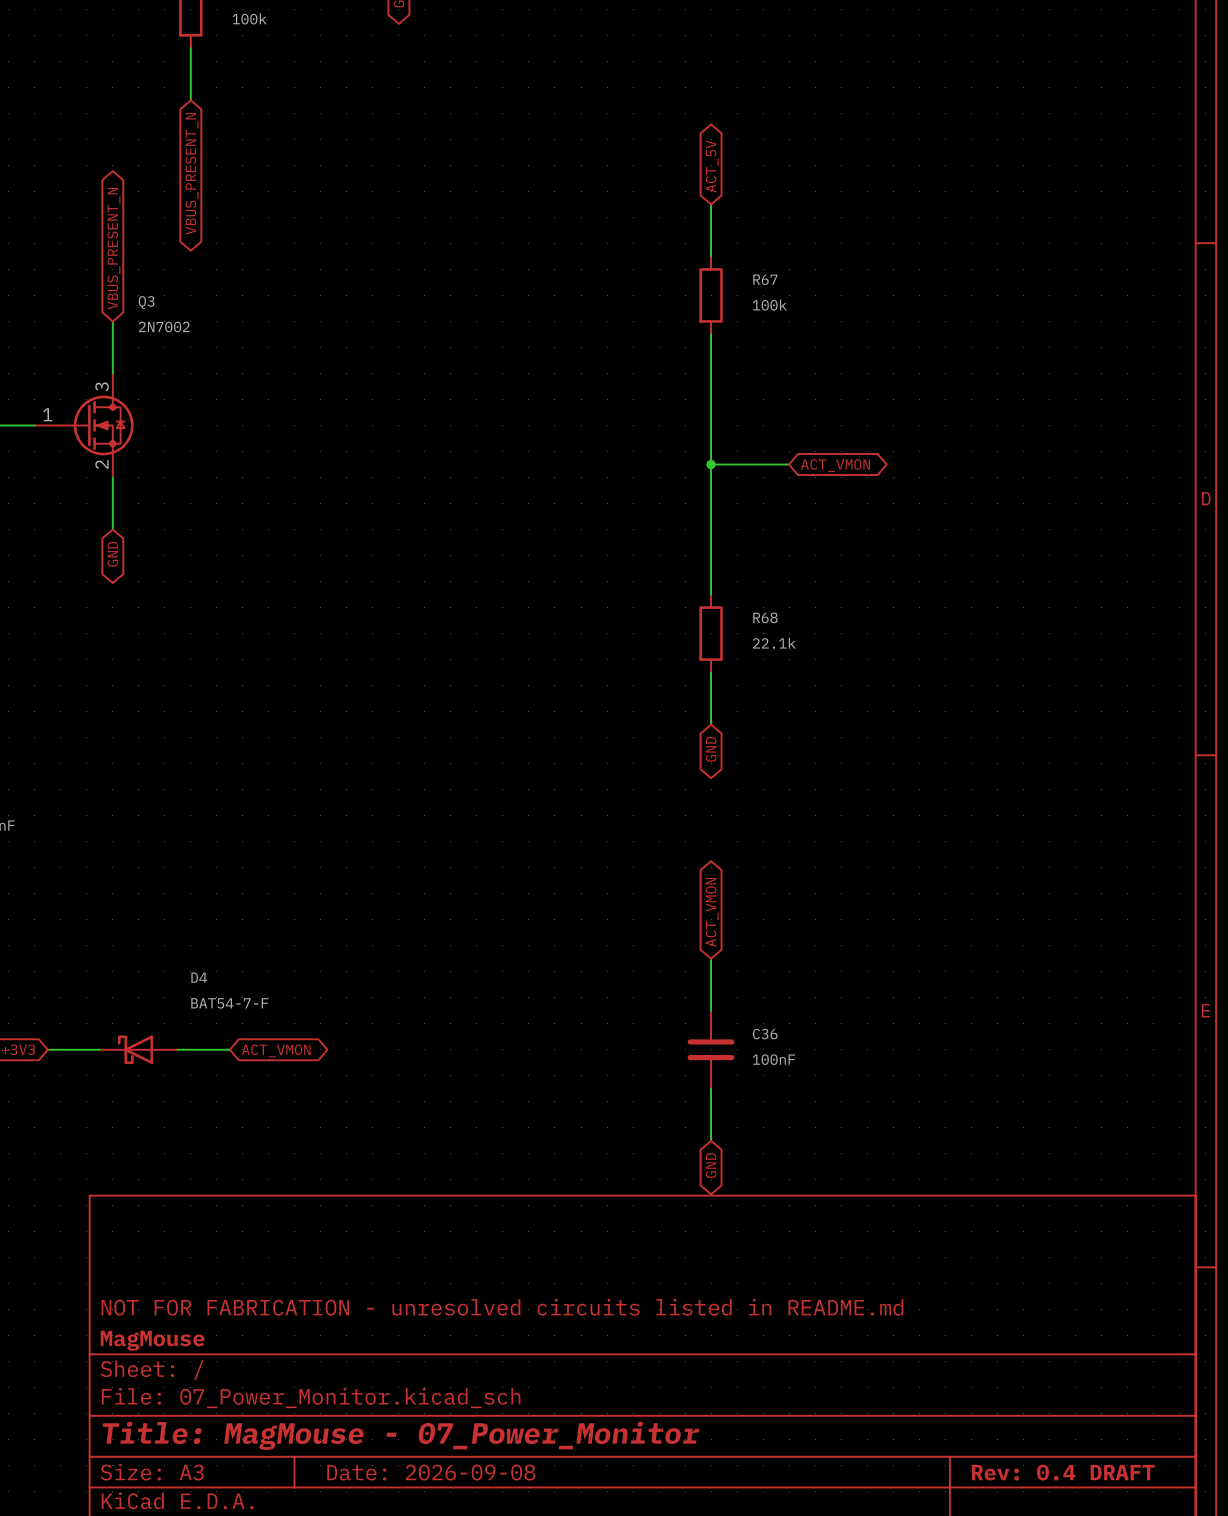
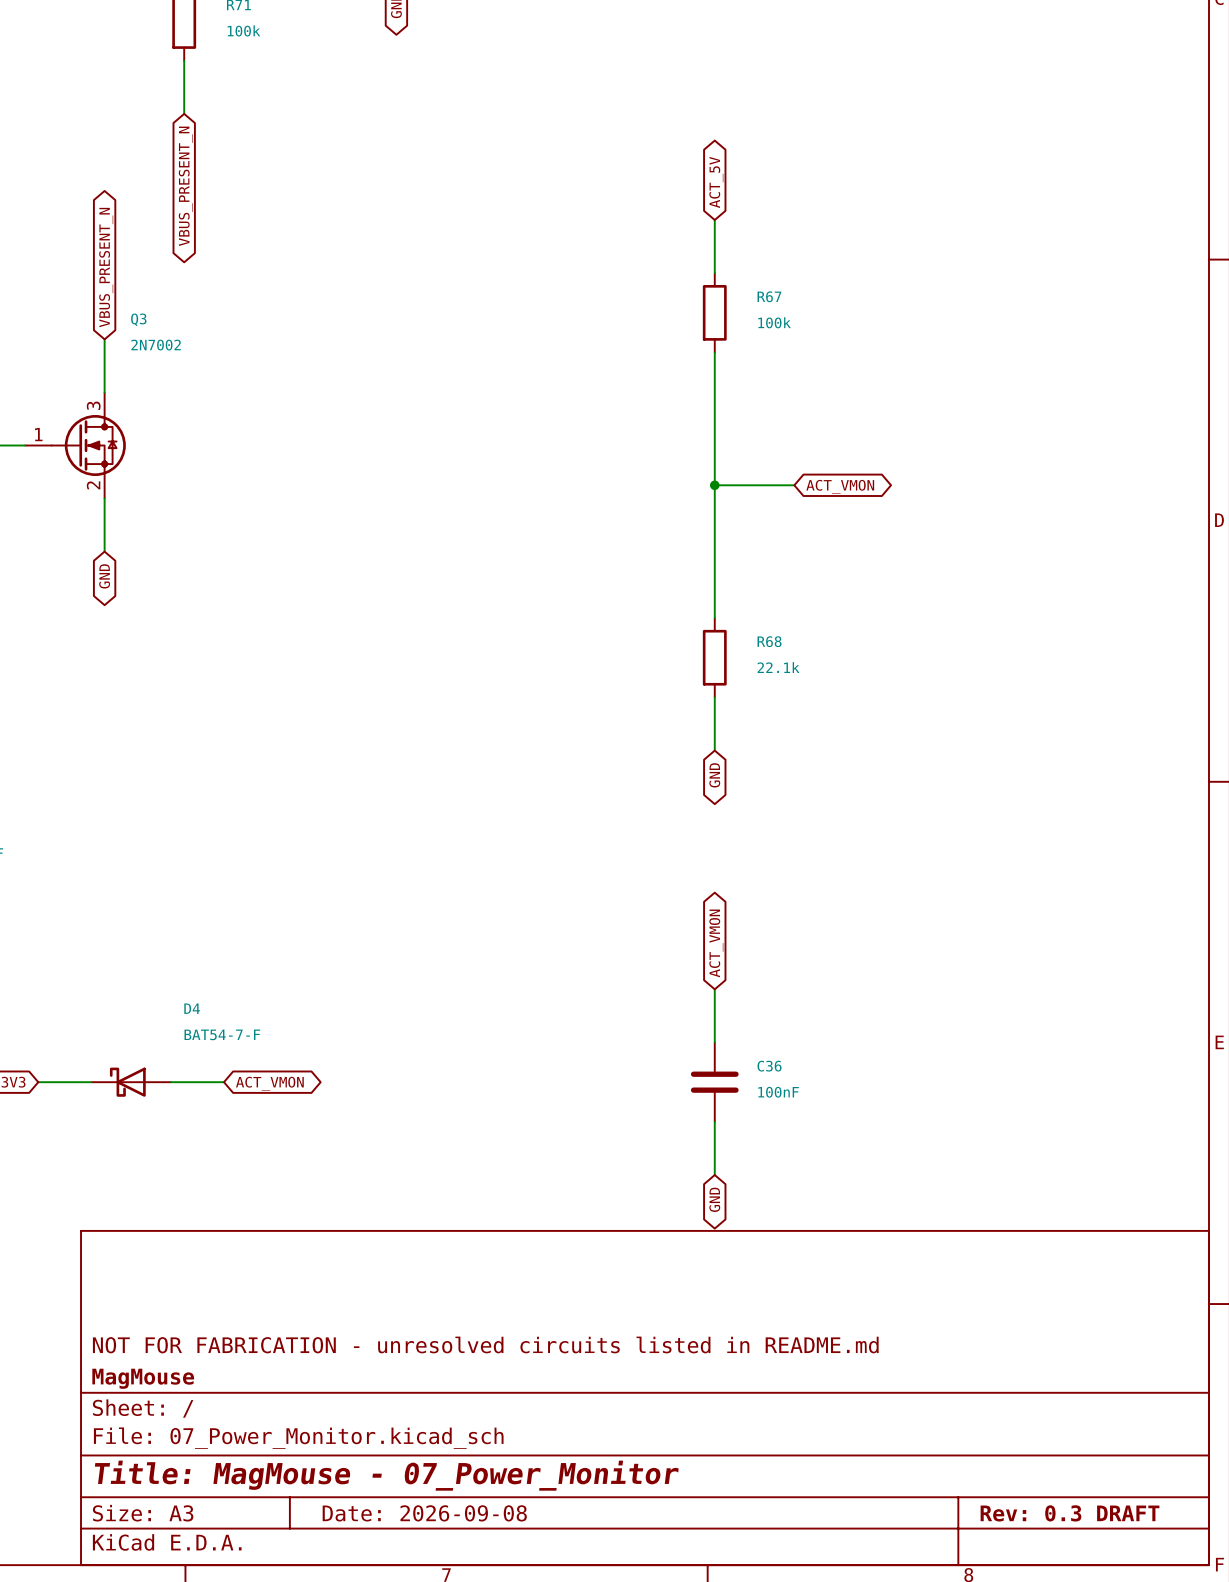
title block: Rev: 0.4 DRAFT (1063, 1472) -> Rev: 0.3 DRAFT (1070, 1513)

